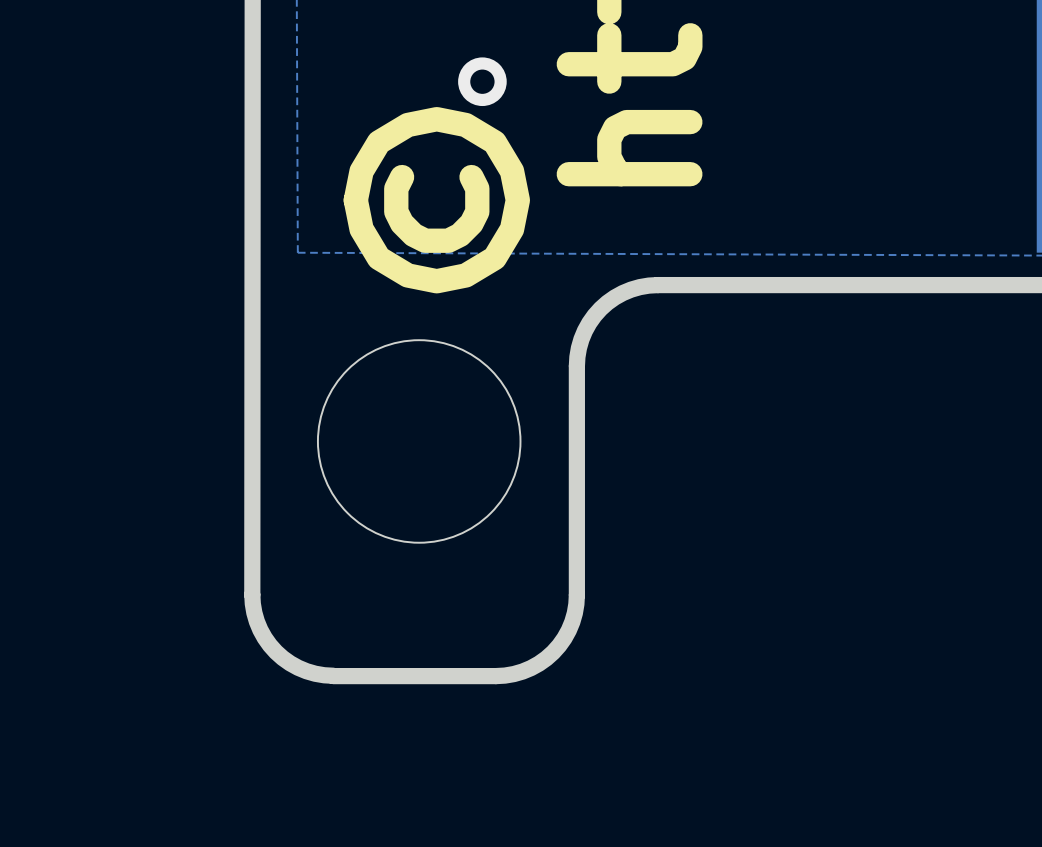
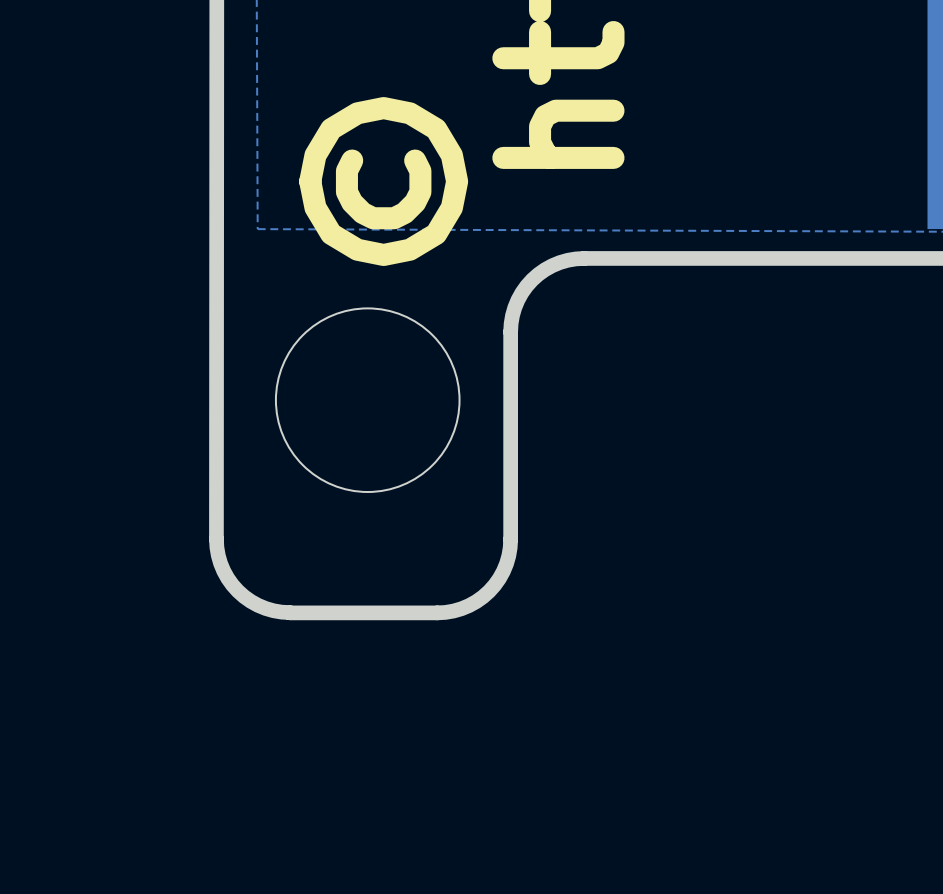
via: (482, 81) -> none

